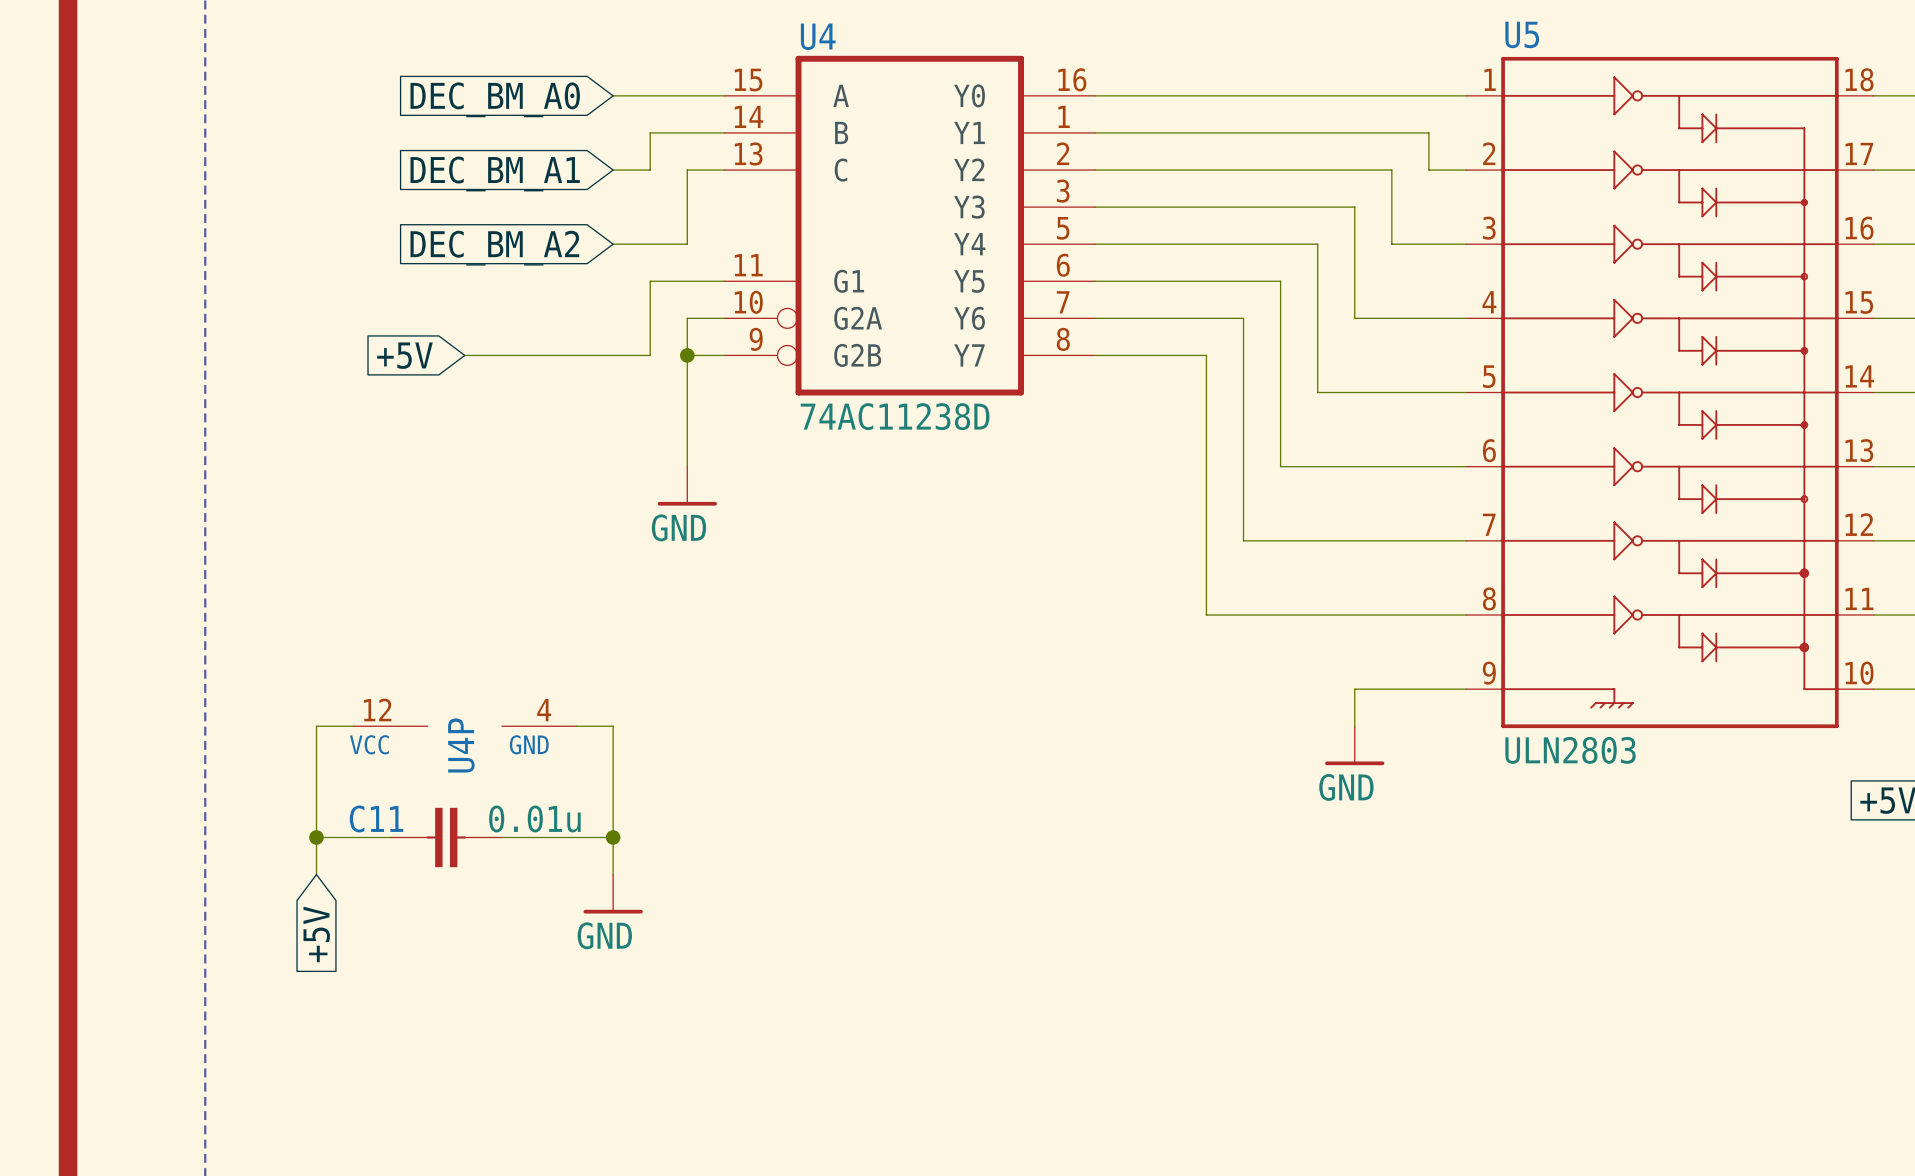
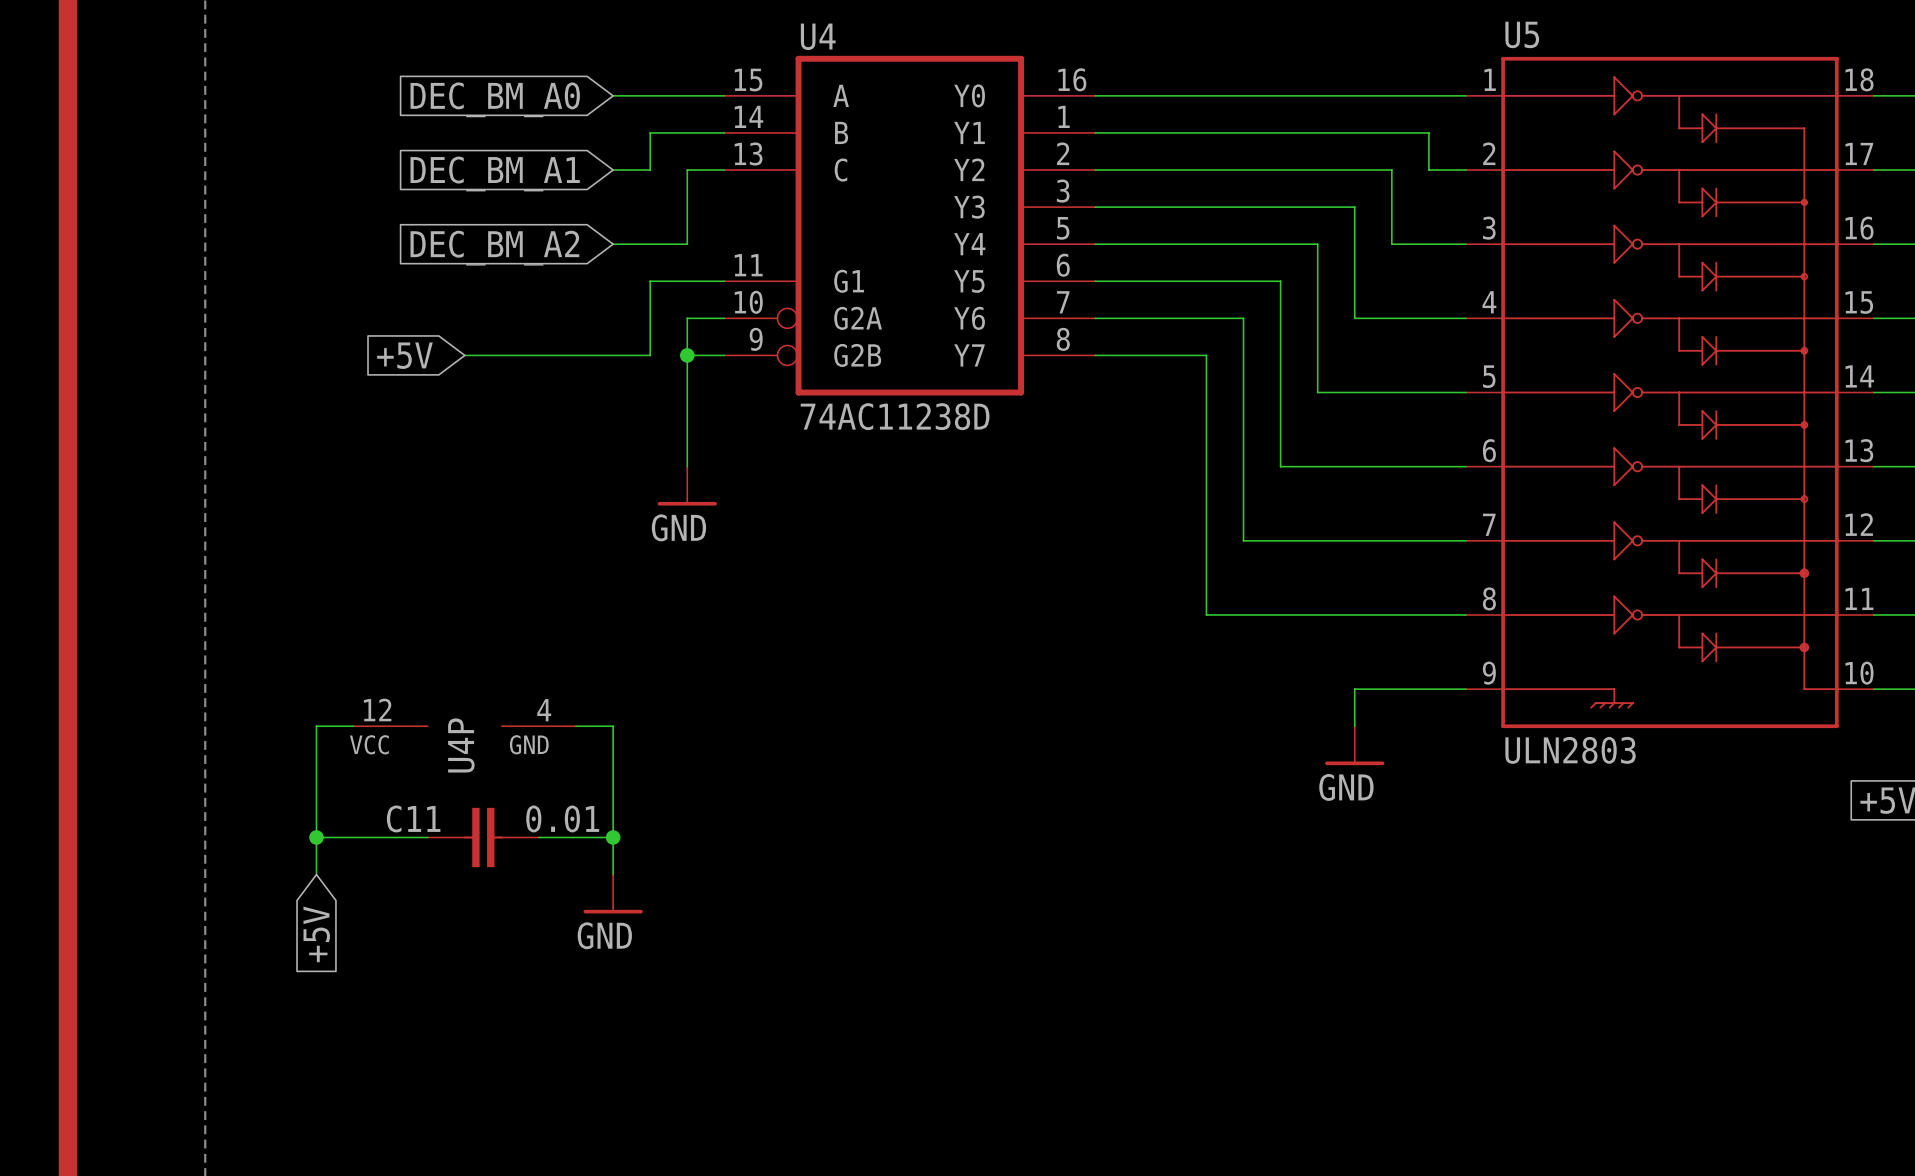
C11 value: 0.01u (534, 818) -> 0.01 (562, 818)
C11 position: (446, 837) -> (483, 837)

